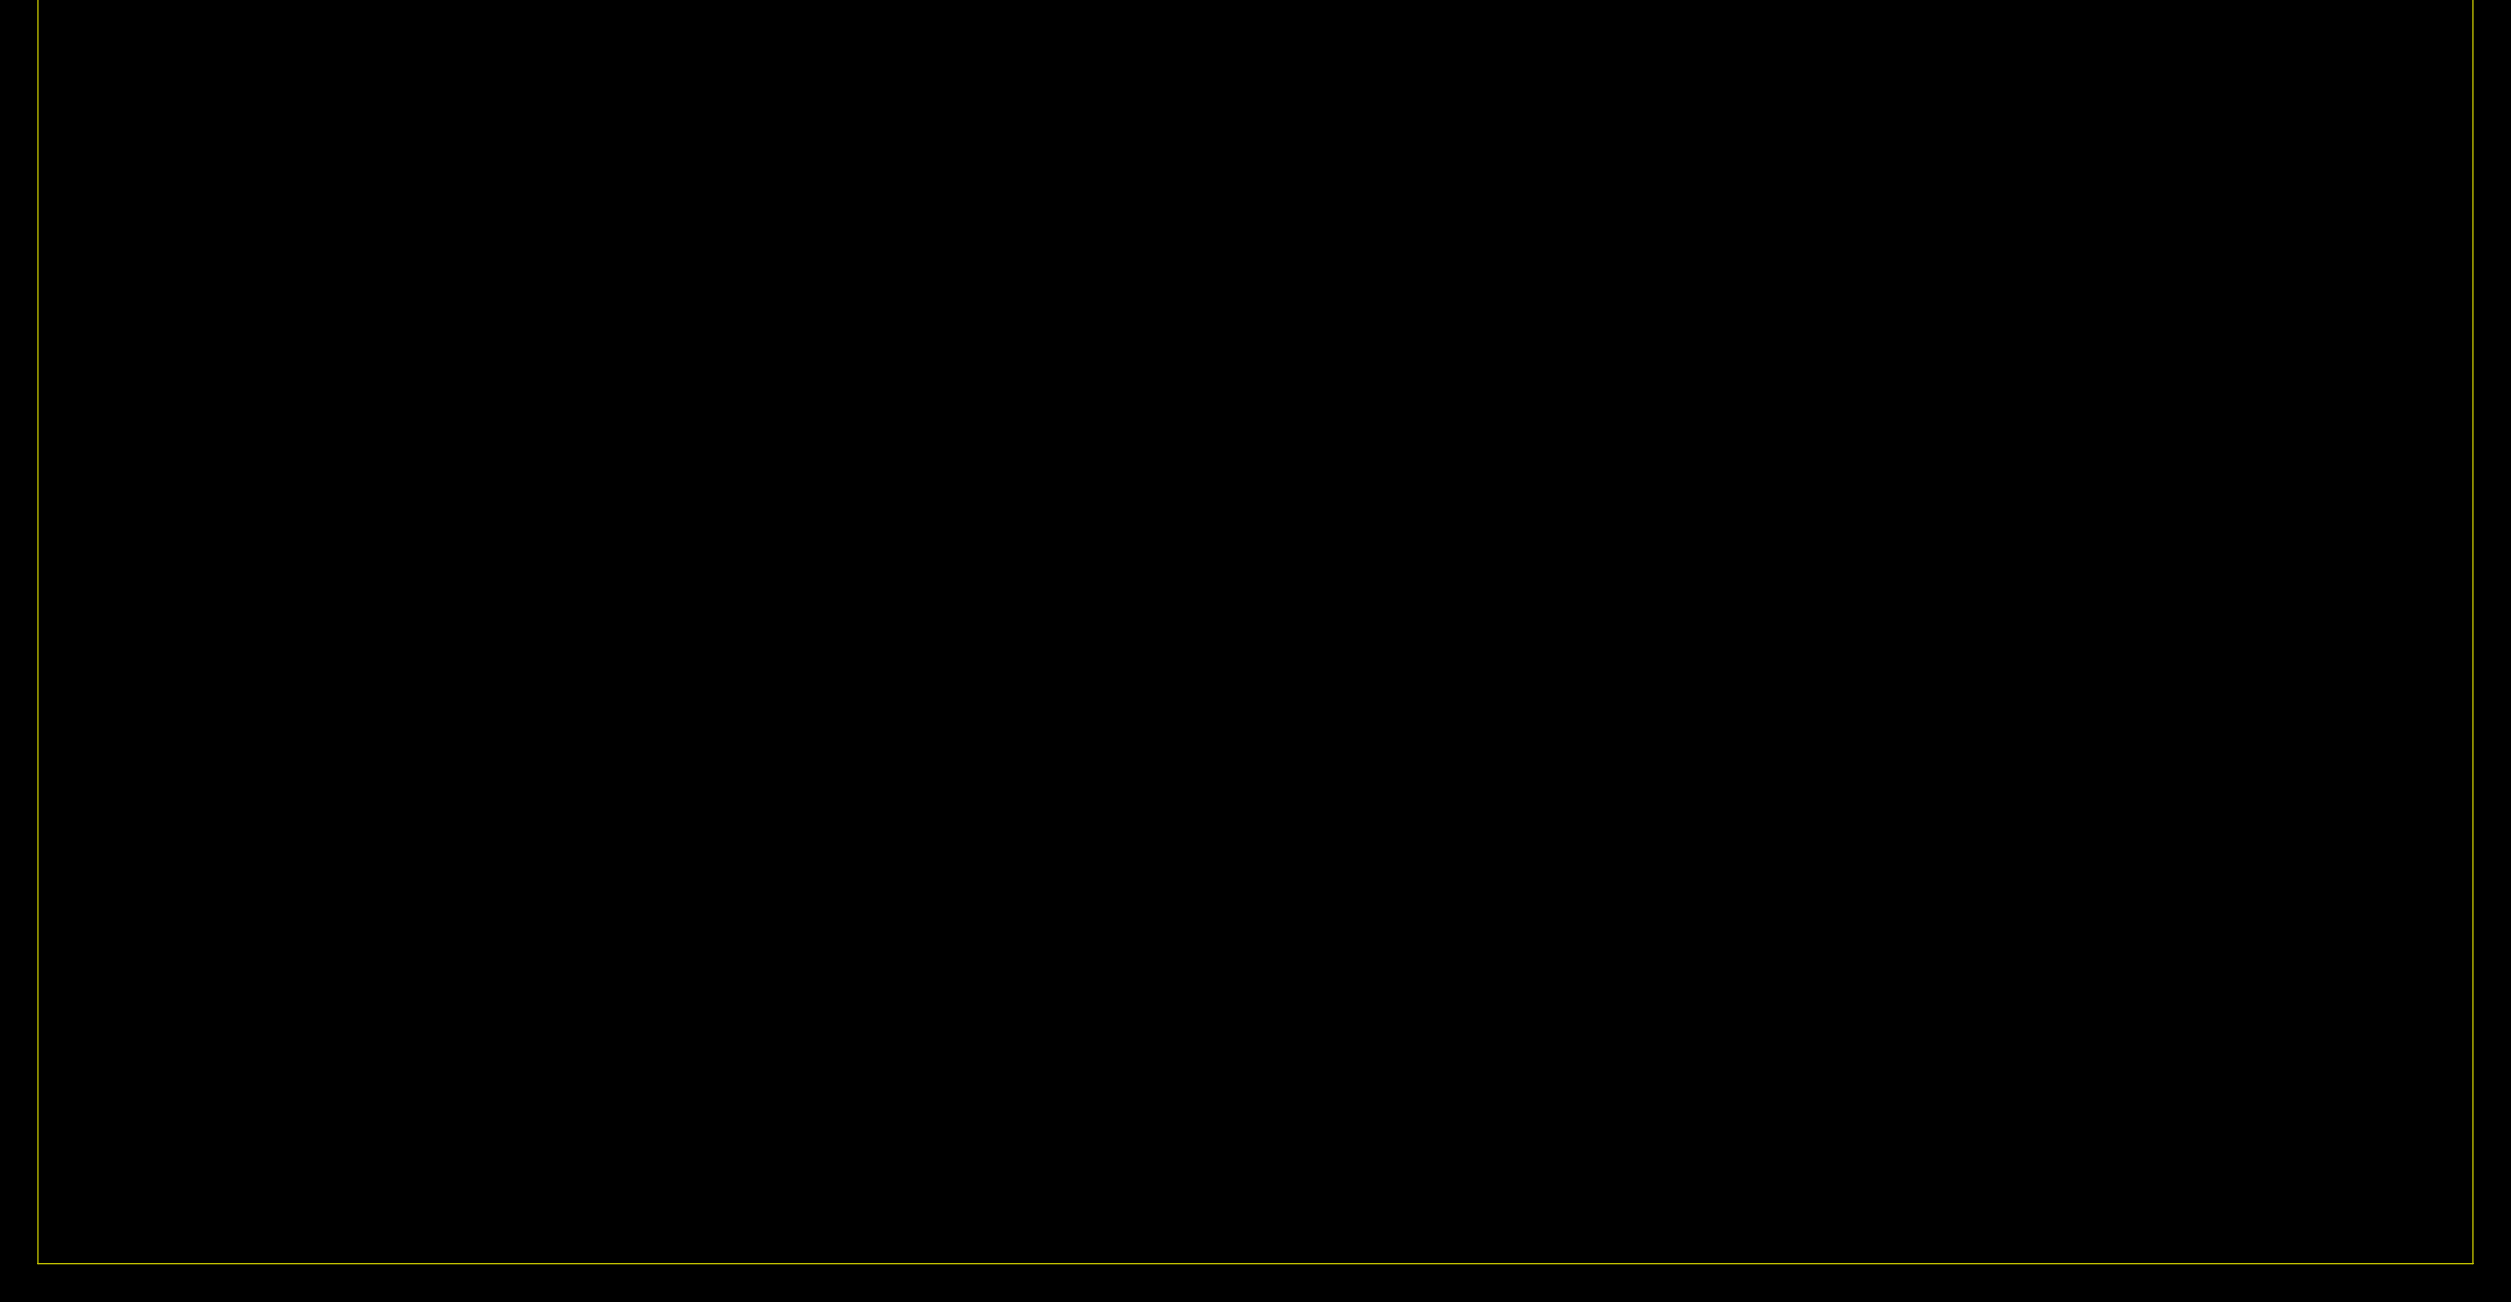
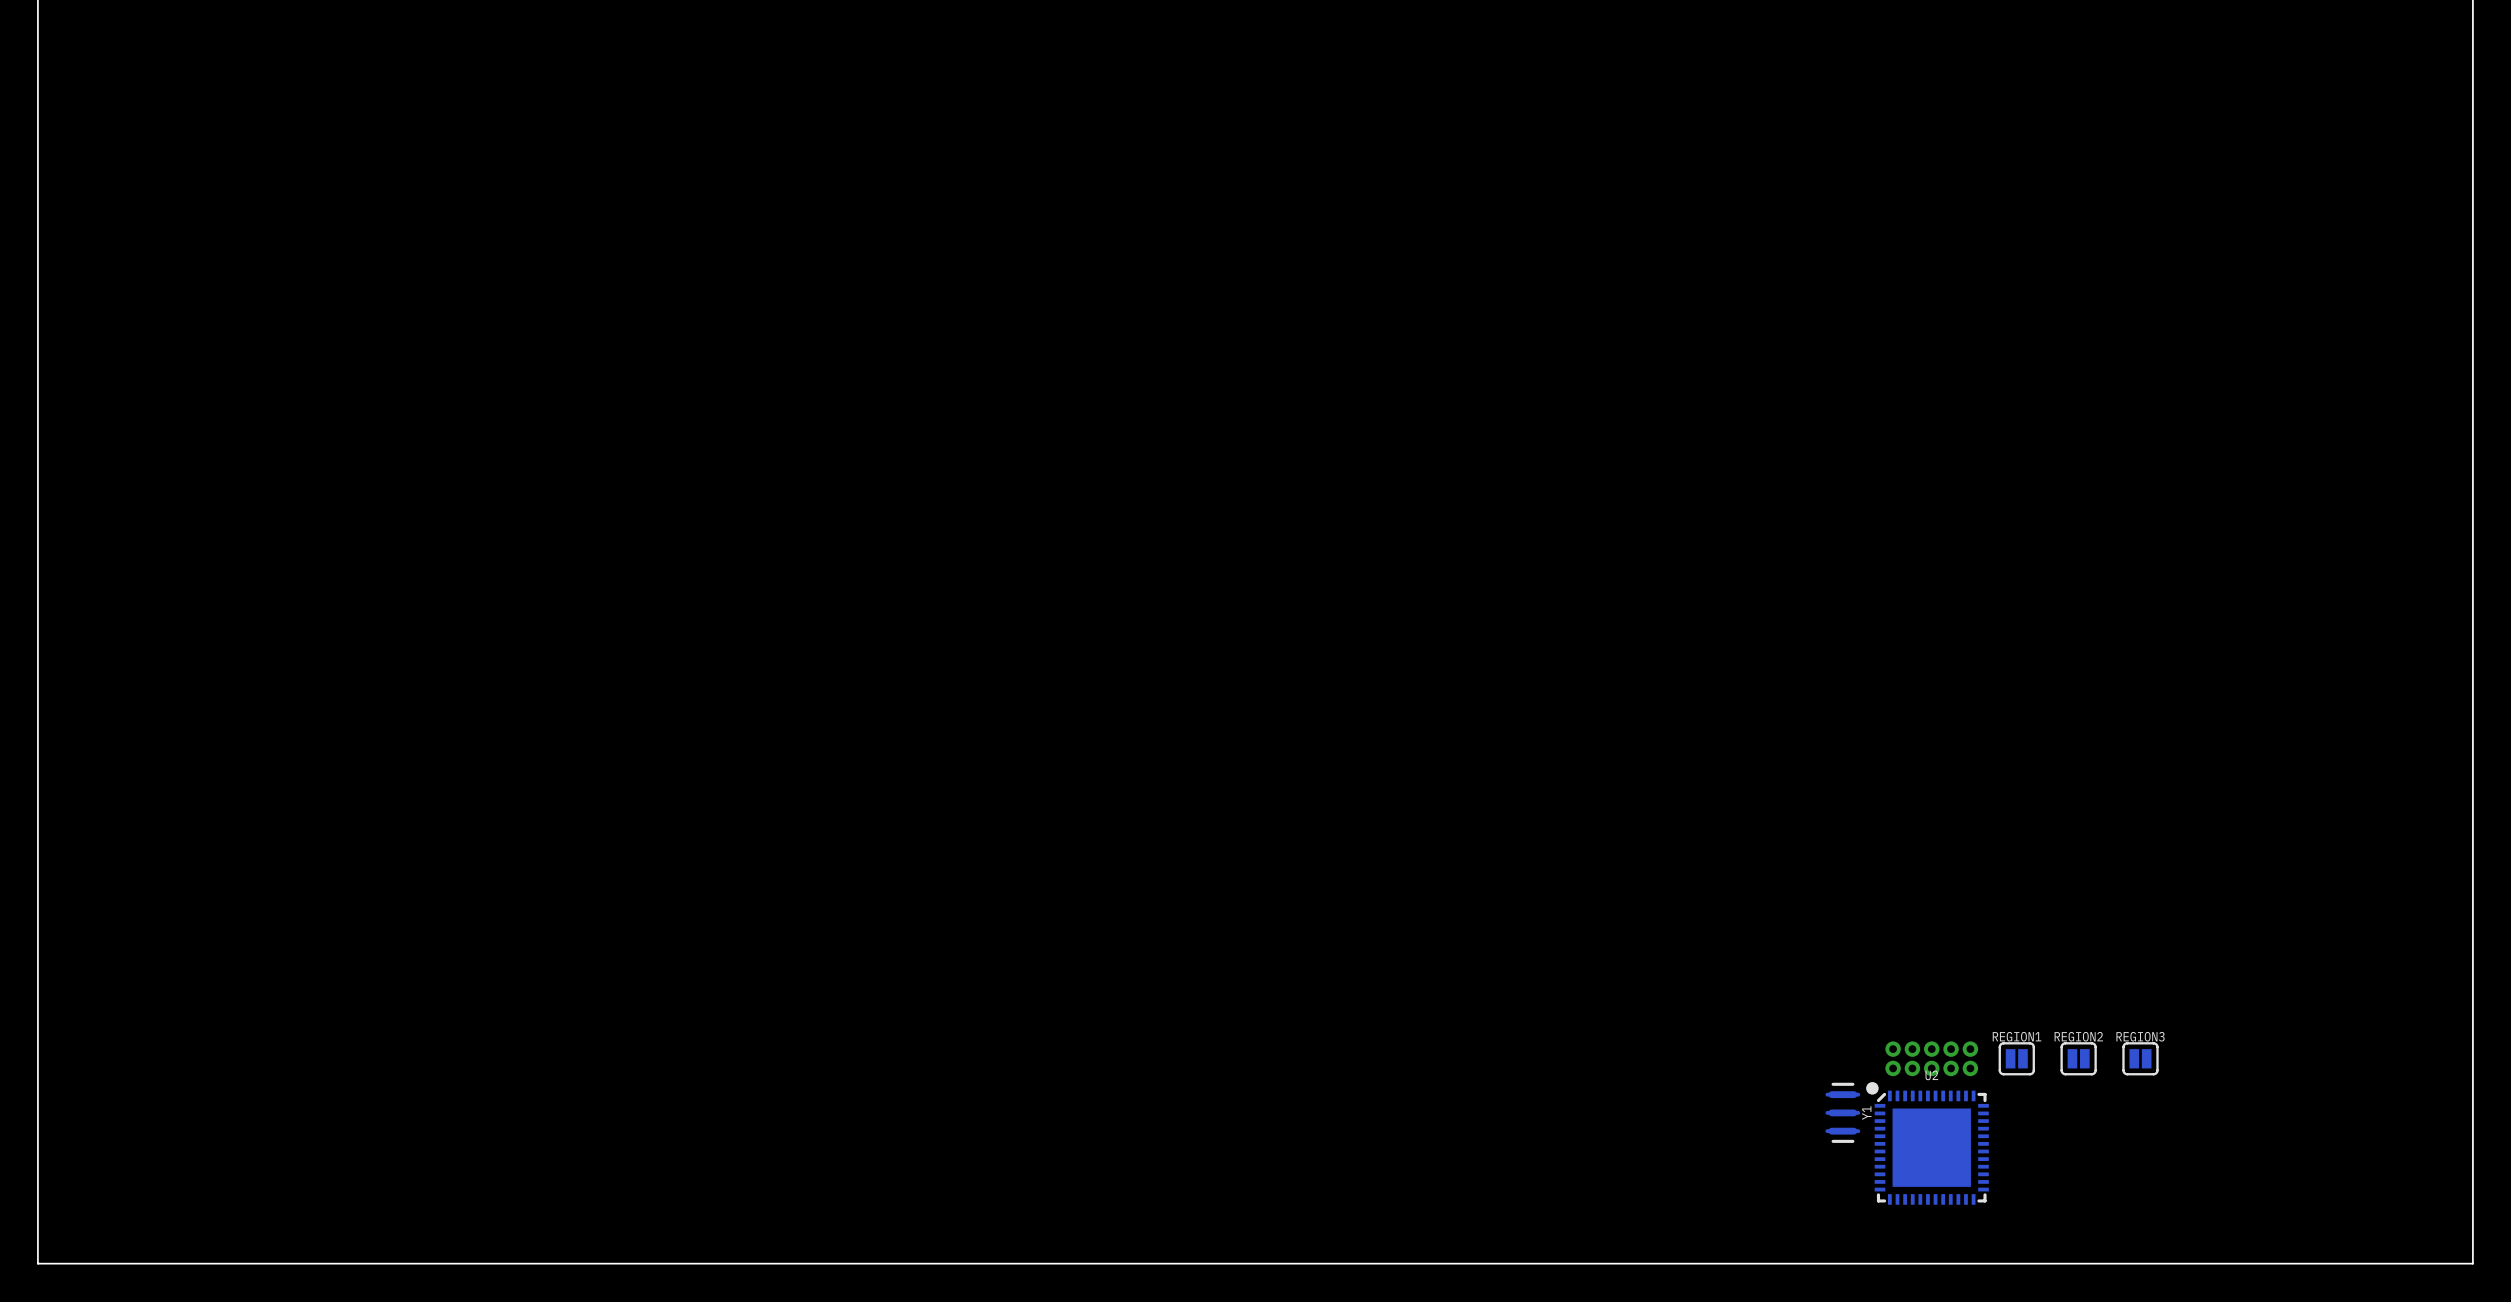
part: none -> (1931, 1058)
REGION1: none -> (2016, 1058)
REGION2: none -> (2078, 1058)
REGION3: none -> (2140, 1058)
Y1: none -> (1842, 1112)
U2: none -> (1927, 1143)

